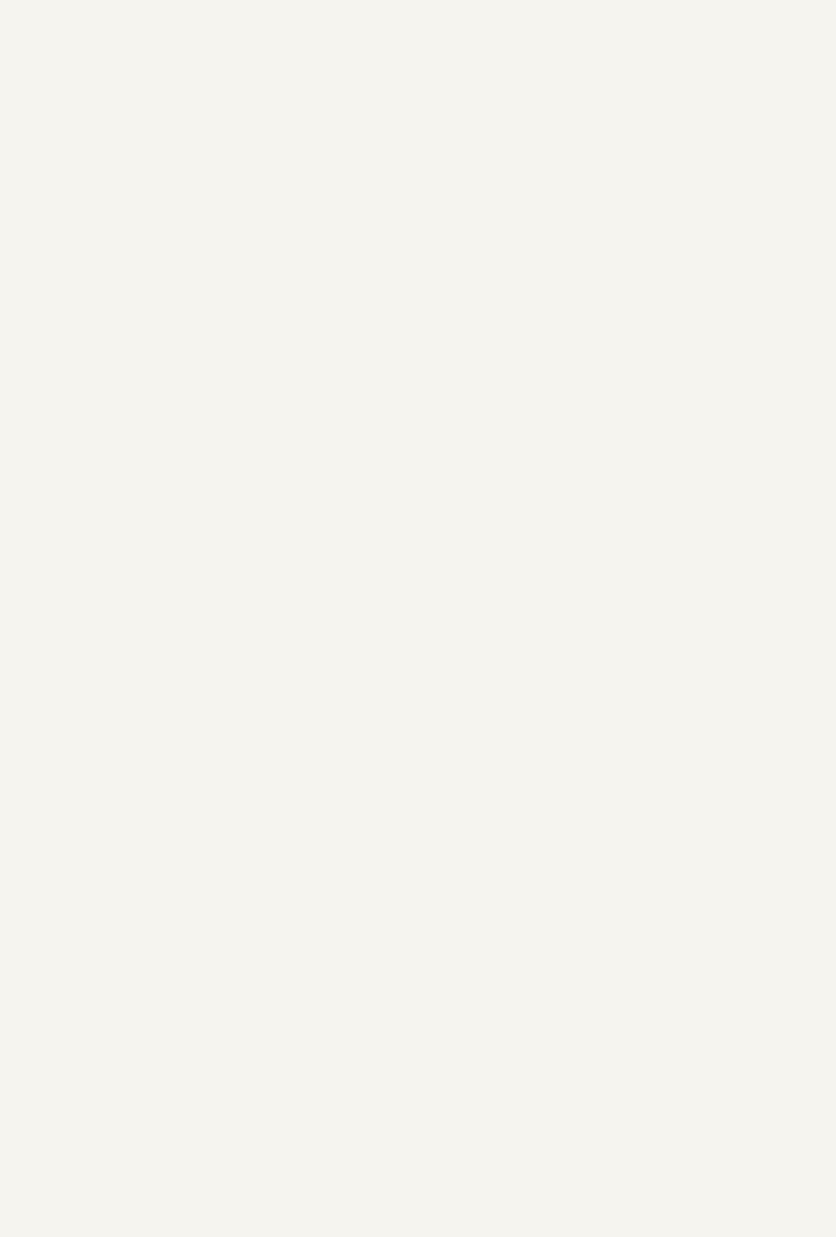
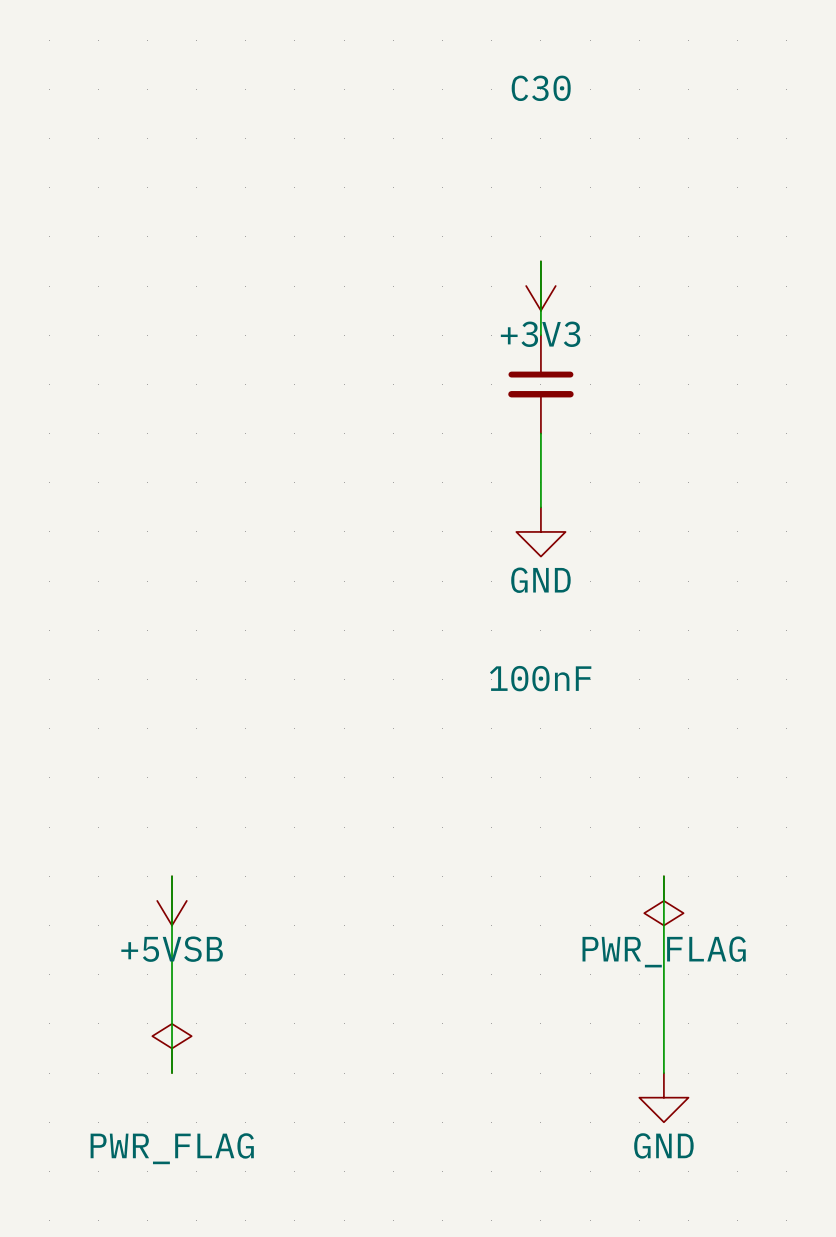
wire: none -> (540, 261) (540, 335)
power symbol: none -> +3V3 (540, 286)
C30: none -> 100nF (540, 384)
wire: none -> (540, 433) (540, 507)
power symbol: none -> GND (540, 531)
wire: none -> (172, 876) (172, 1073)
wire: none -> (663, 876) (663, 1073)
power symbol: none -> +5VSB (172, 900)
power symbol: none -> PWR_FLAG (663, 900)
power symbol: none -> PWR_FLAG (172, 1048)
power symbol: none -> GND (663, 1097)

